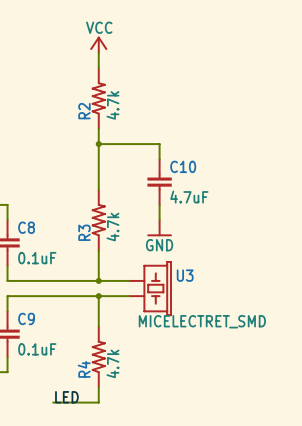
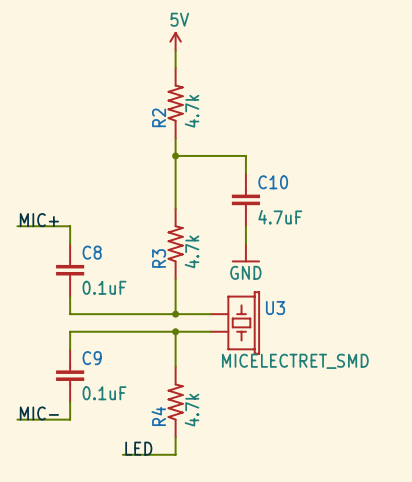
power symbol: VCC (98, 44) -> 5V (175, 41)

